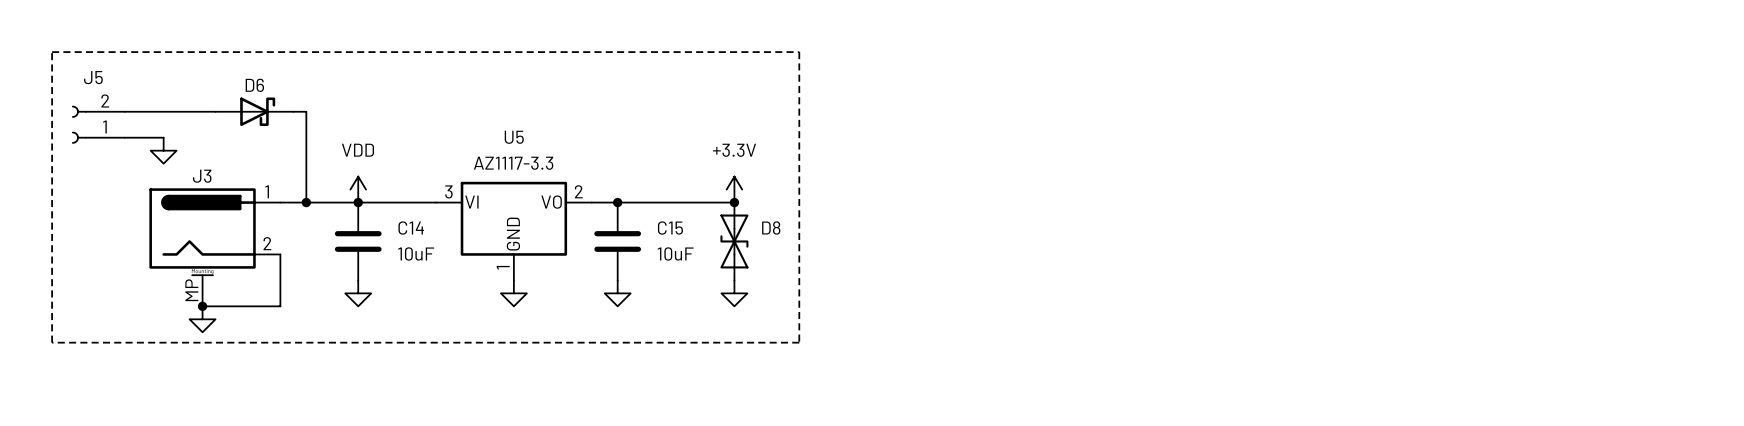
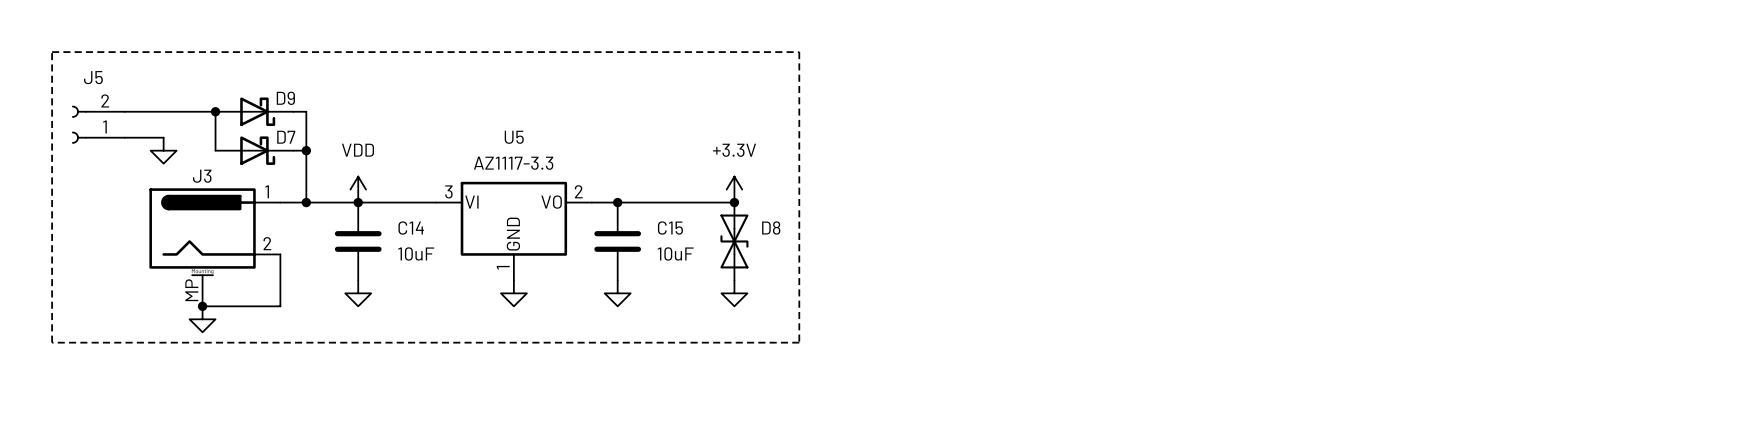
wire: none -> (215, 111) (215, 150)
junction: none -> (215, 111)
D6: (254, 111) -> none
D9: none -> (254, 111)
D7: none -> (254, 150)
wire: none -> (293, 150) (306, 150)
junction: none -> (306, 150)

